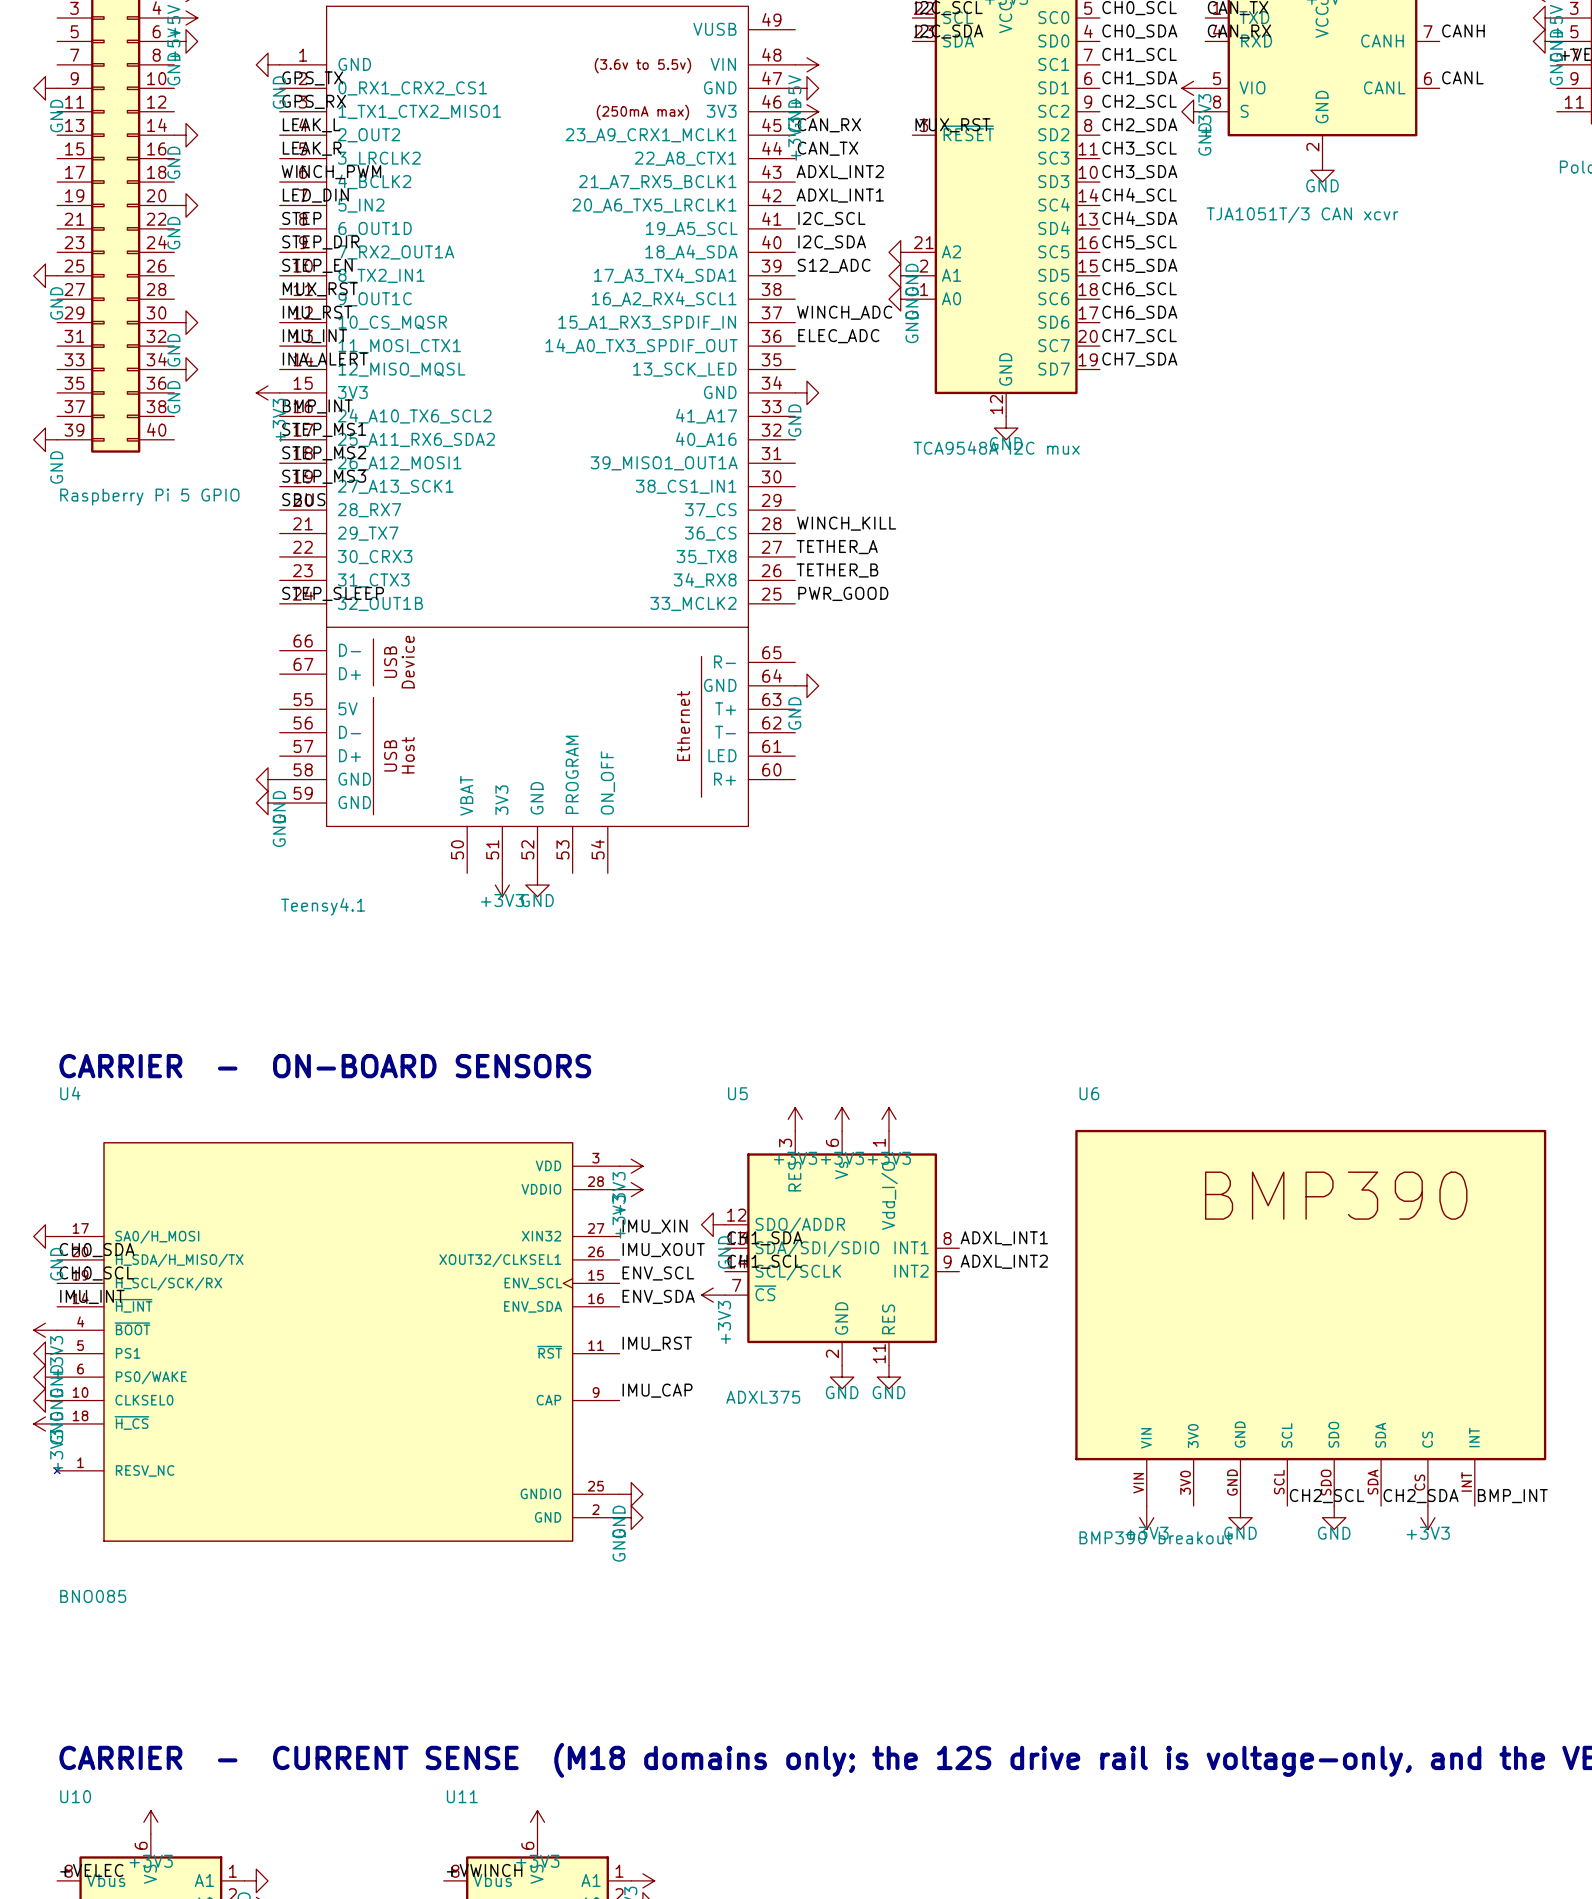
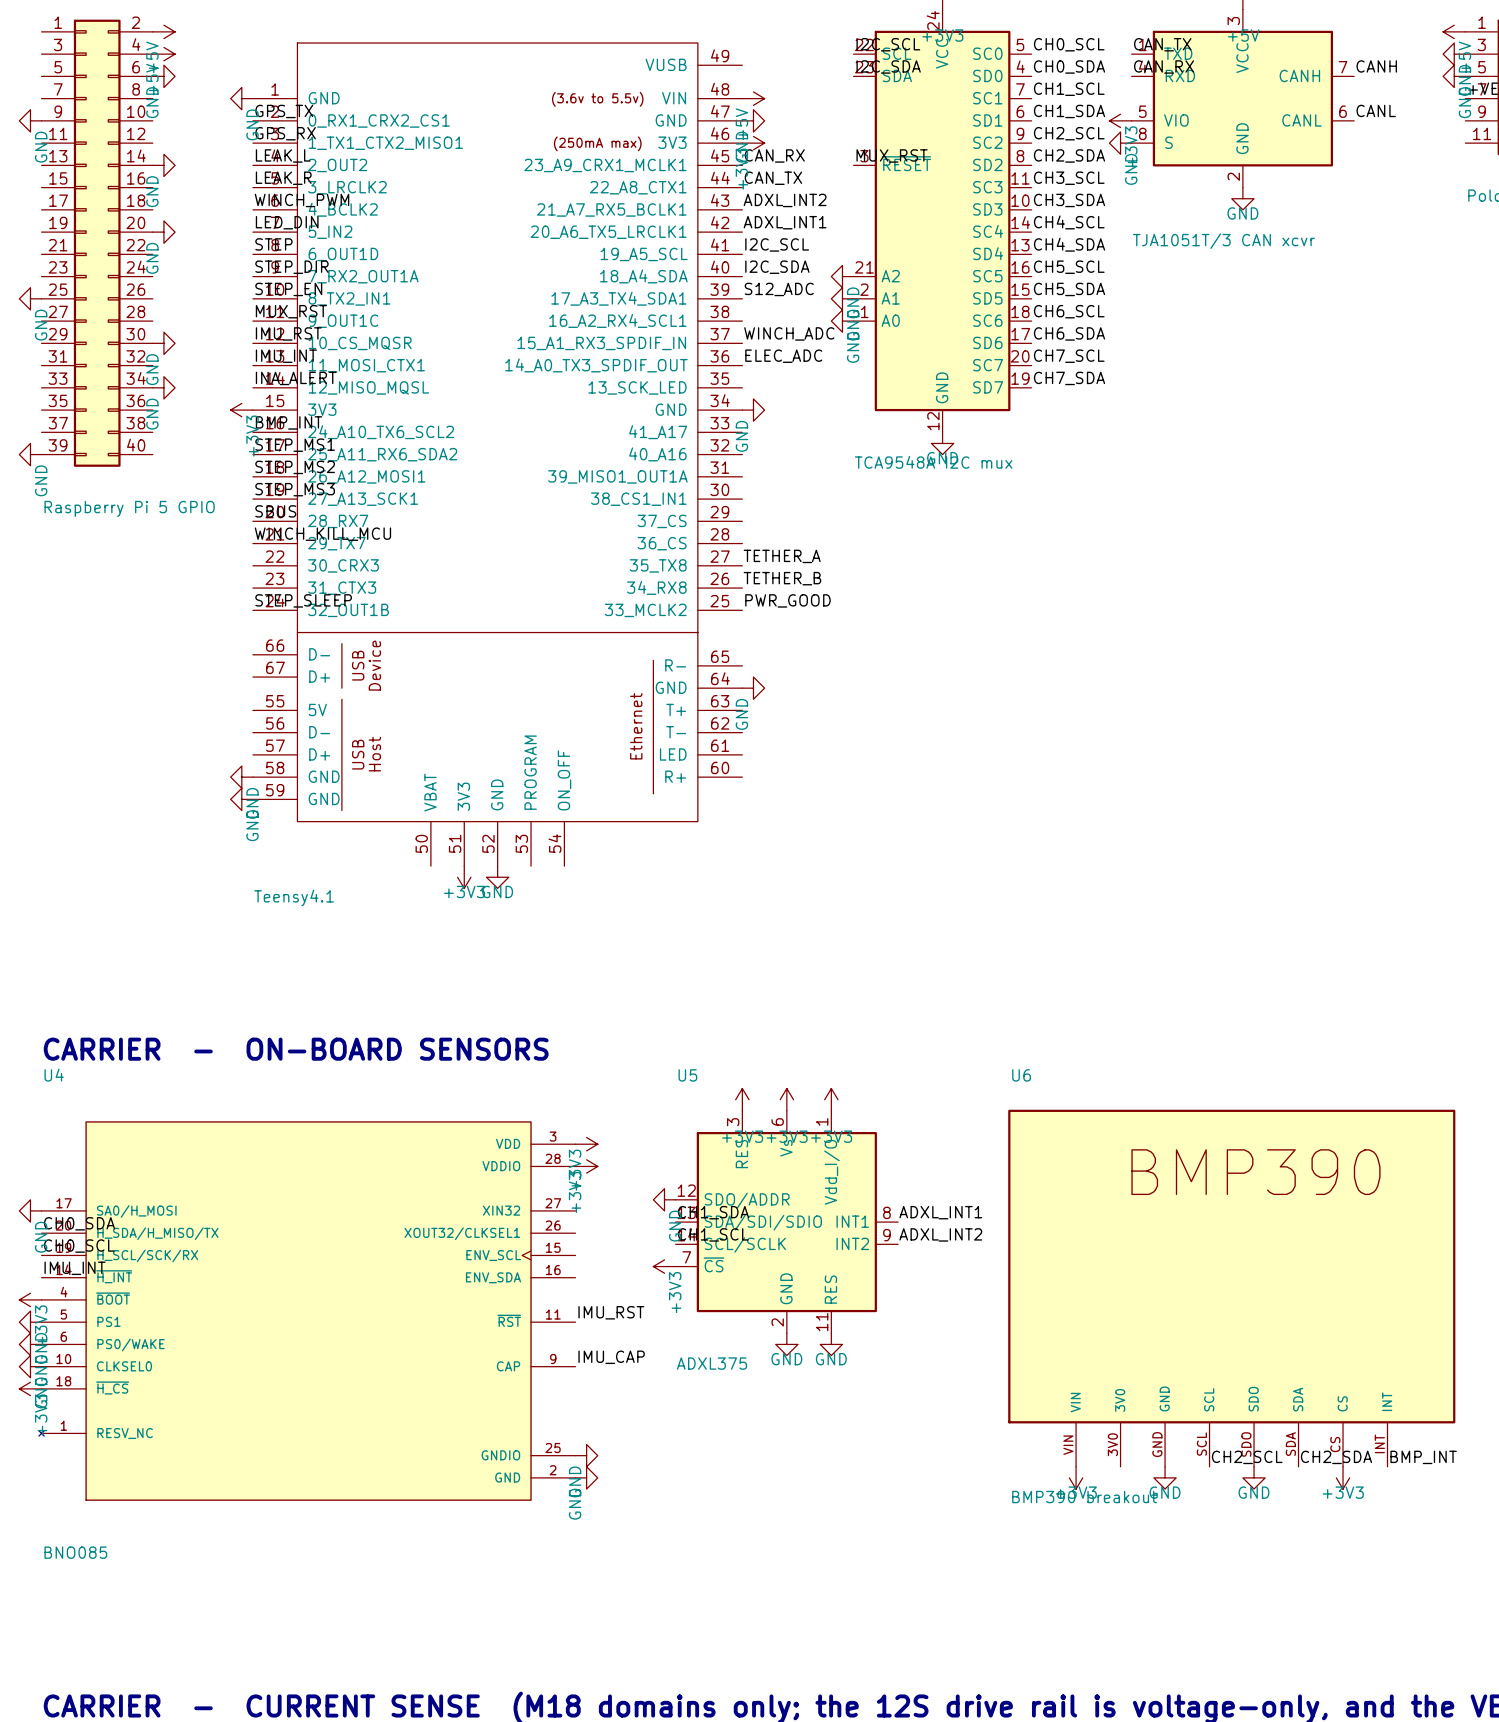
label: none -> WINCH_KILL_MCU (322, 534)
label: WINCH_KILL (846, 523) -> none
label: IMU_XIN (655, 1226) -> none
label: IMU_XOUT (663, 1250) -> none
label: ENV_SCL (658, 1273) -> none
label: ENV_SDA (658, 1296) -> none

